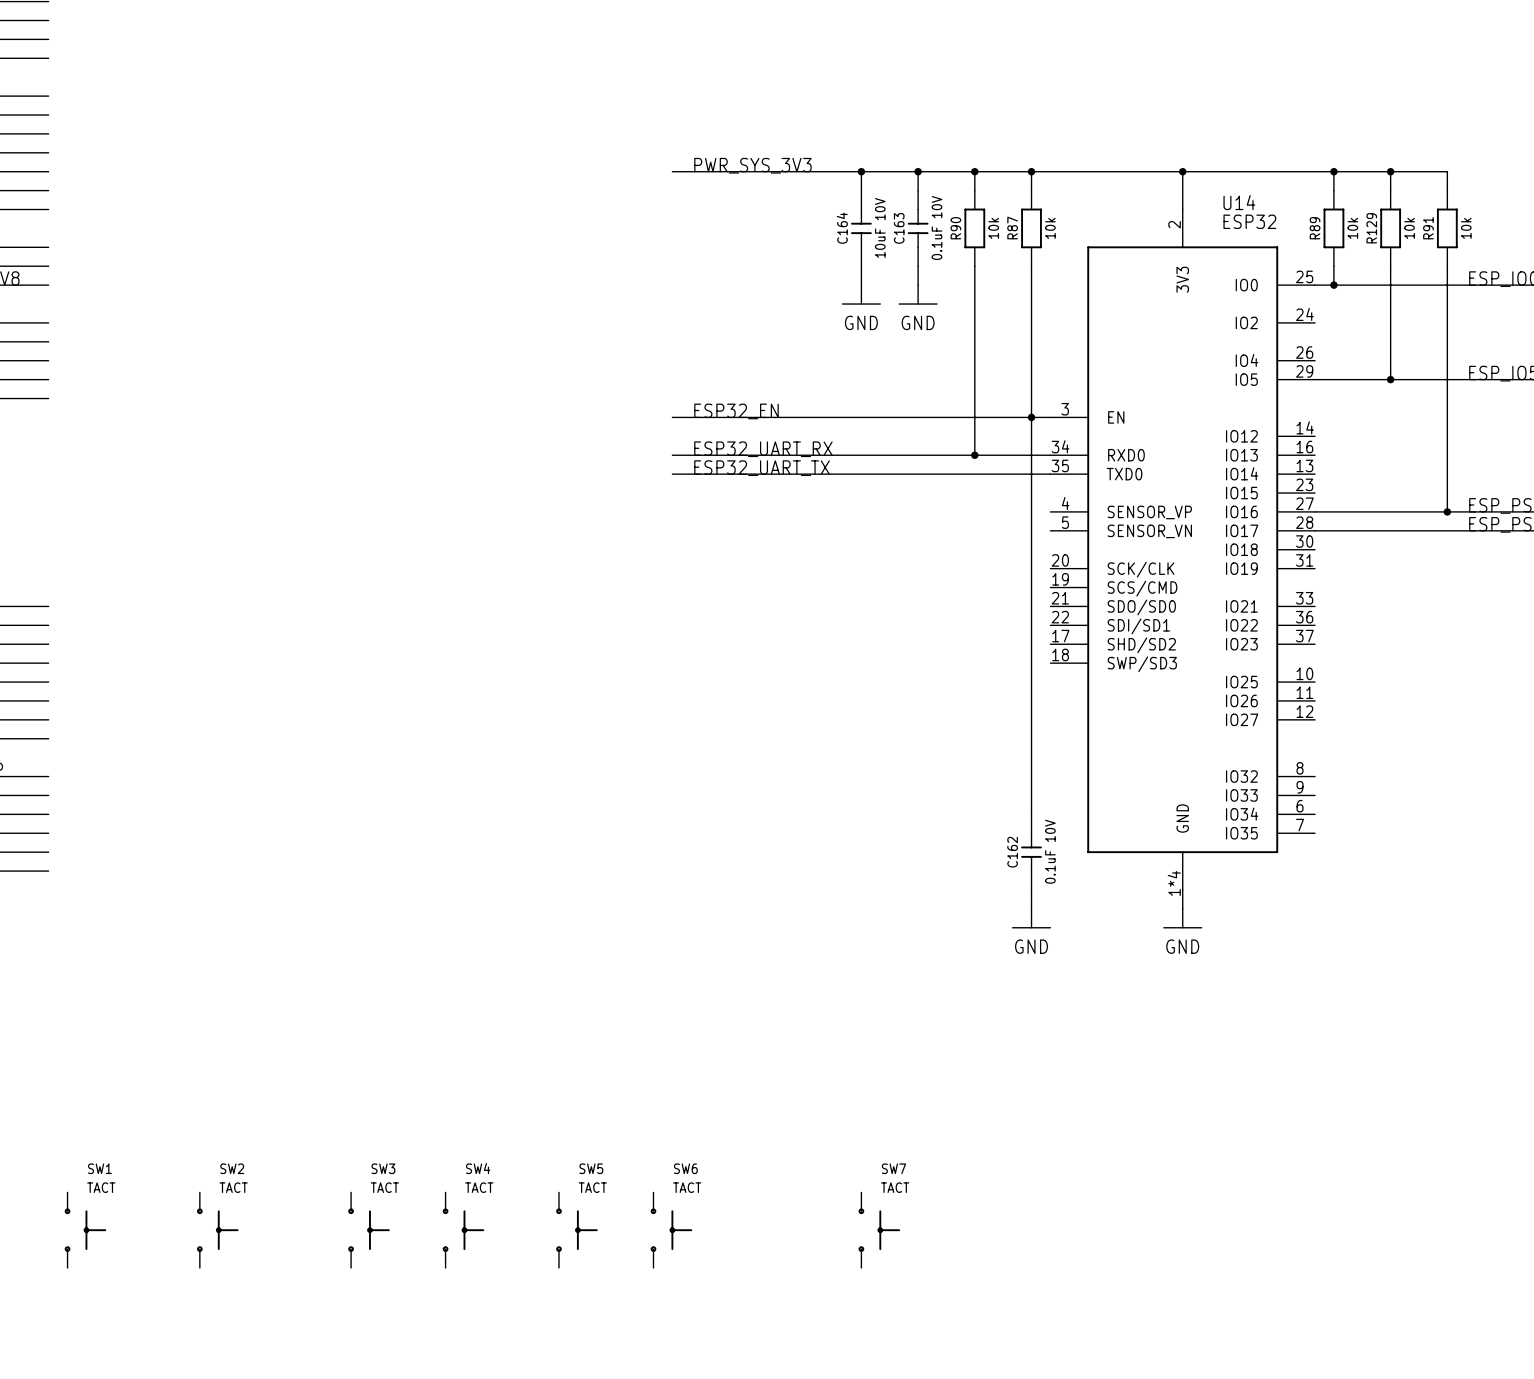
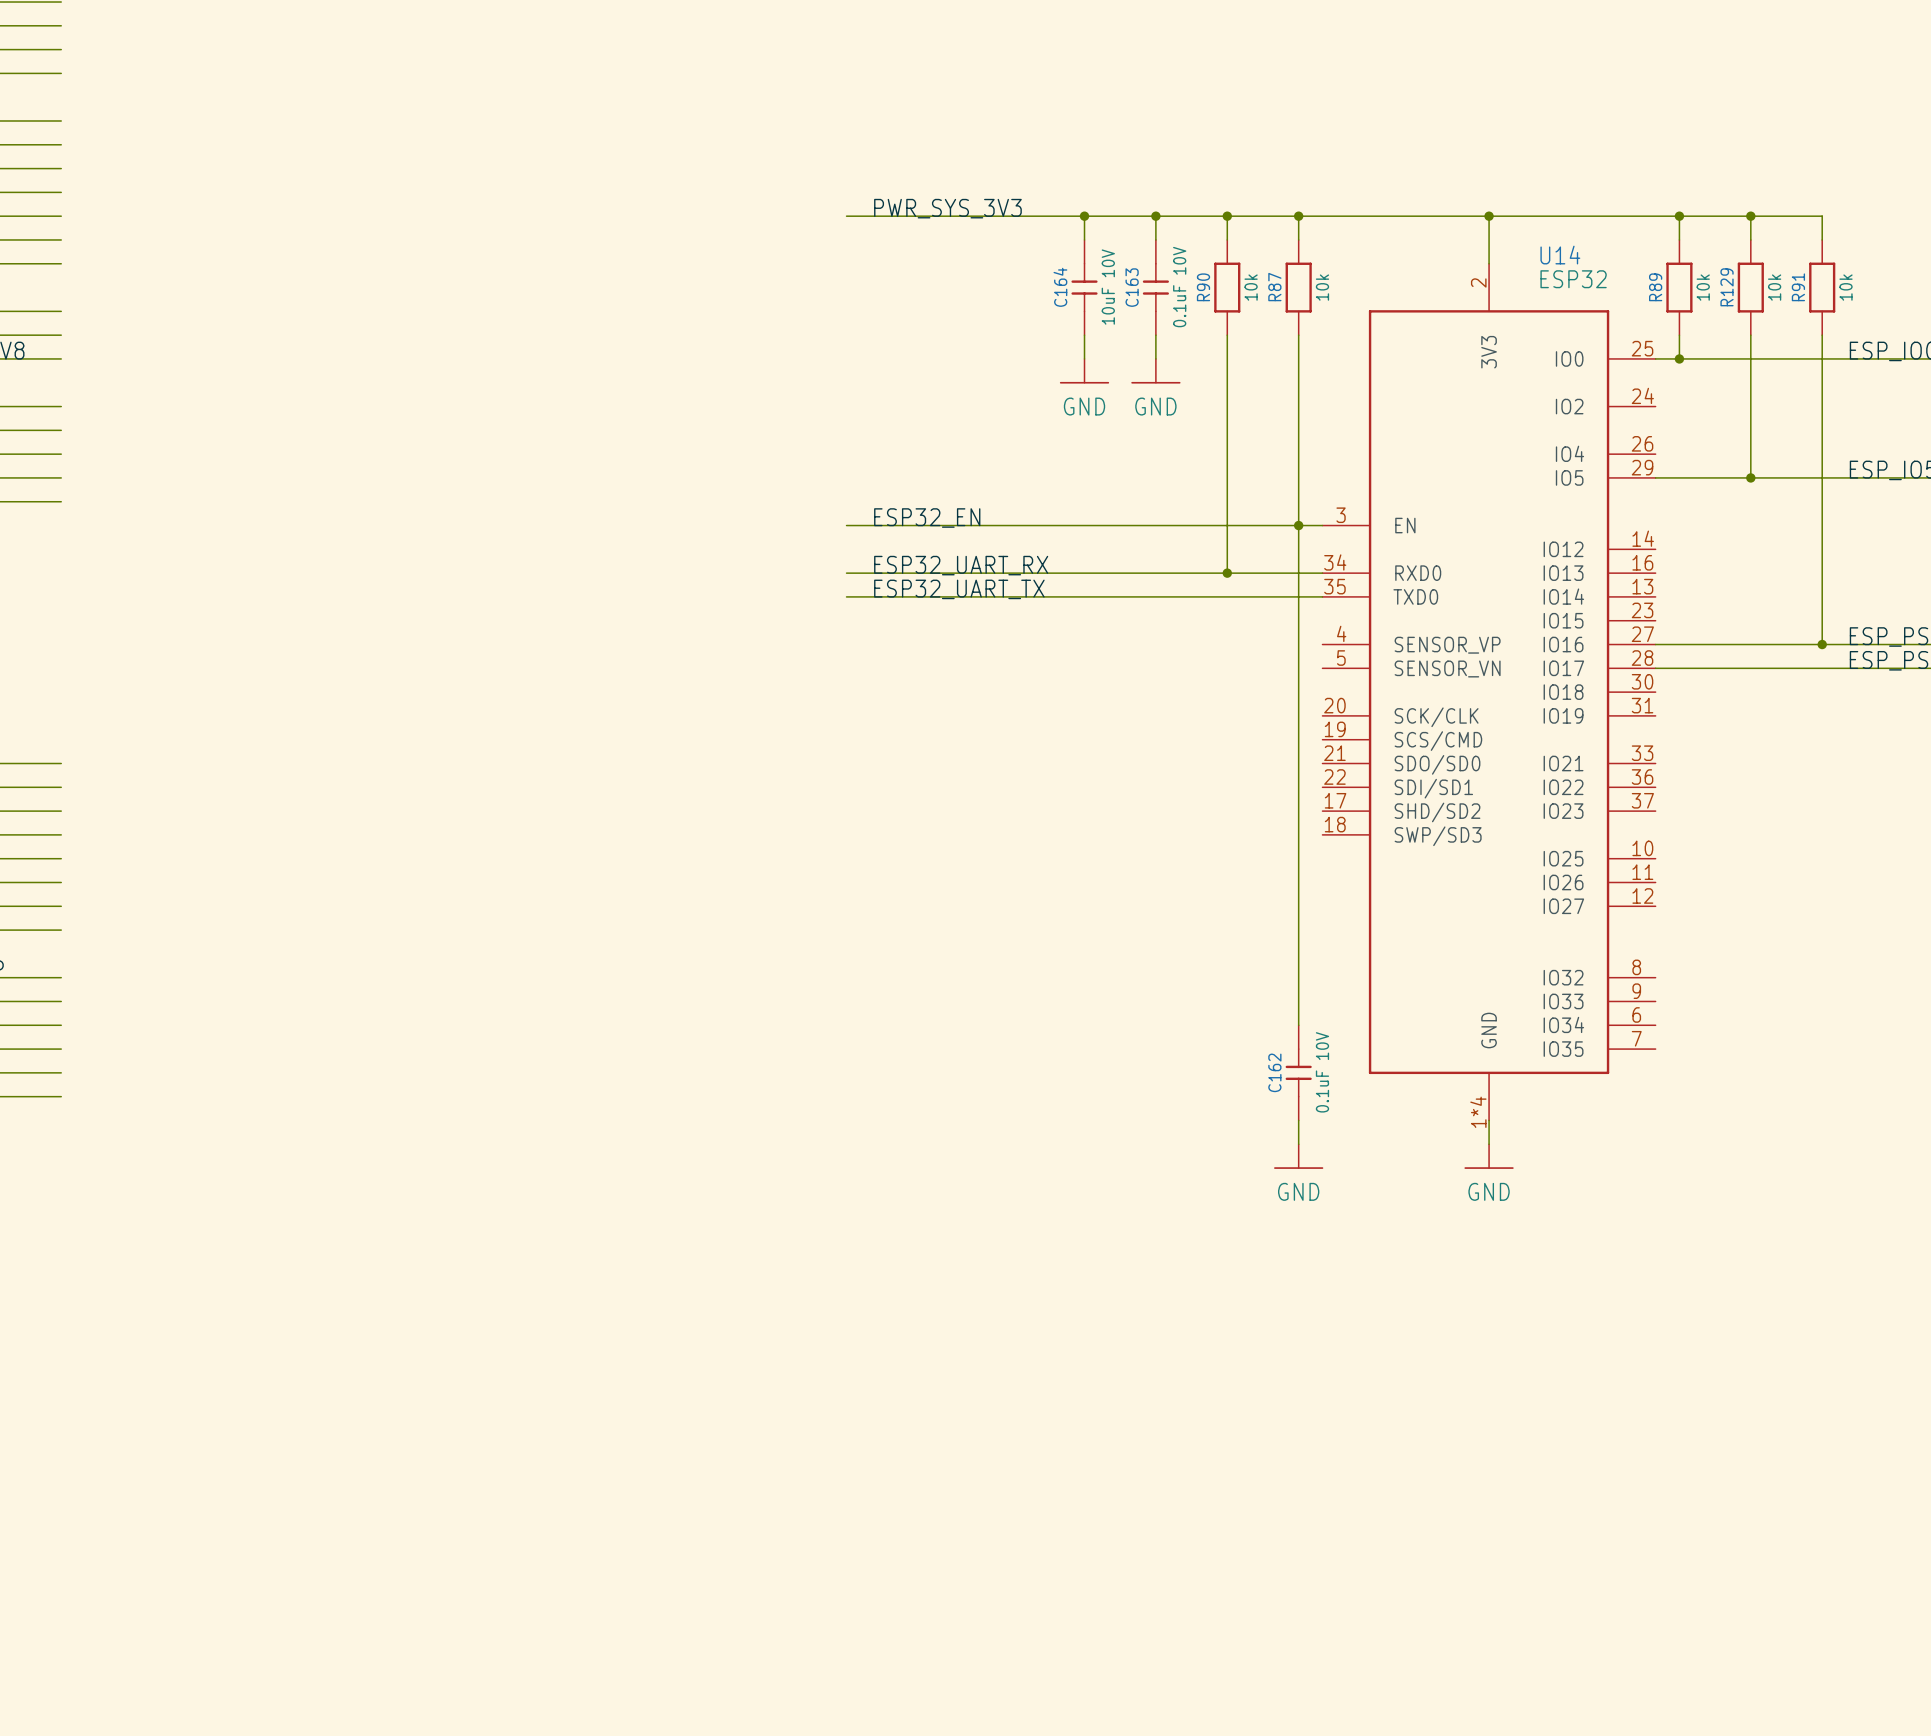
SW1: TACT (85, 1230) -> none
SW2: TACT (217, 1230) -> none
SW3: TACT (369, 1230) -> none
SW4: TACT (463, 1230) -> none
SW5: TACT (576, 1230) -> none
SW6: TACT (671, 1230) -> none
SW7: TACT (879, 1230) -> none

